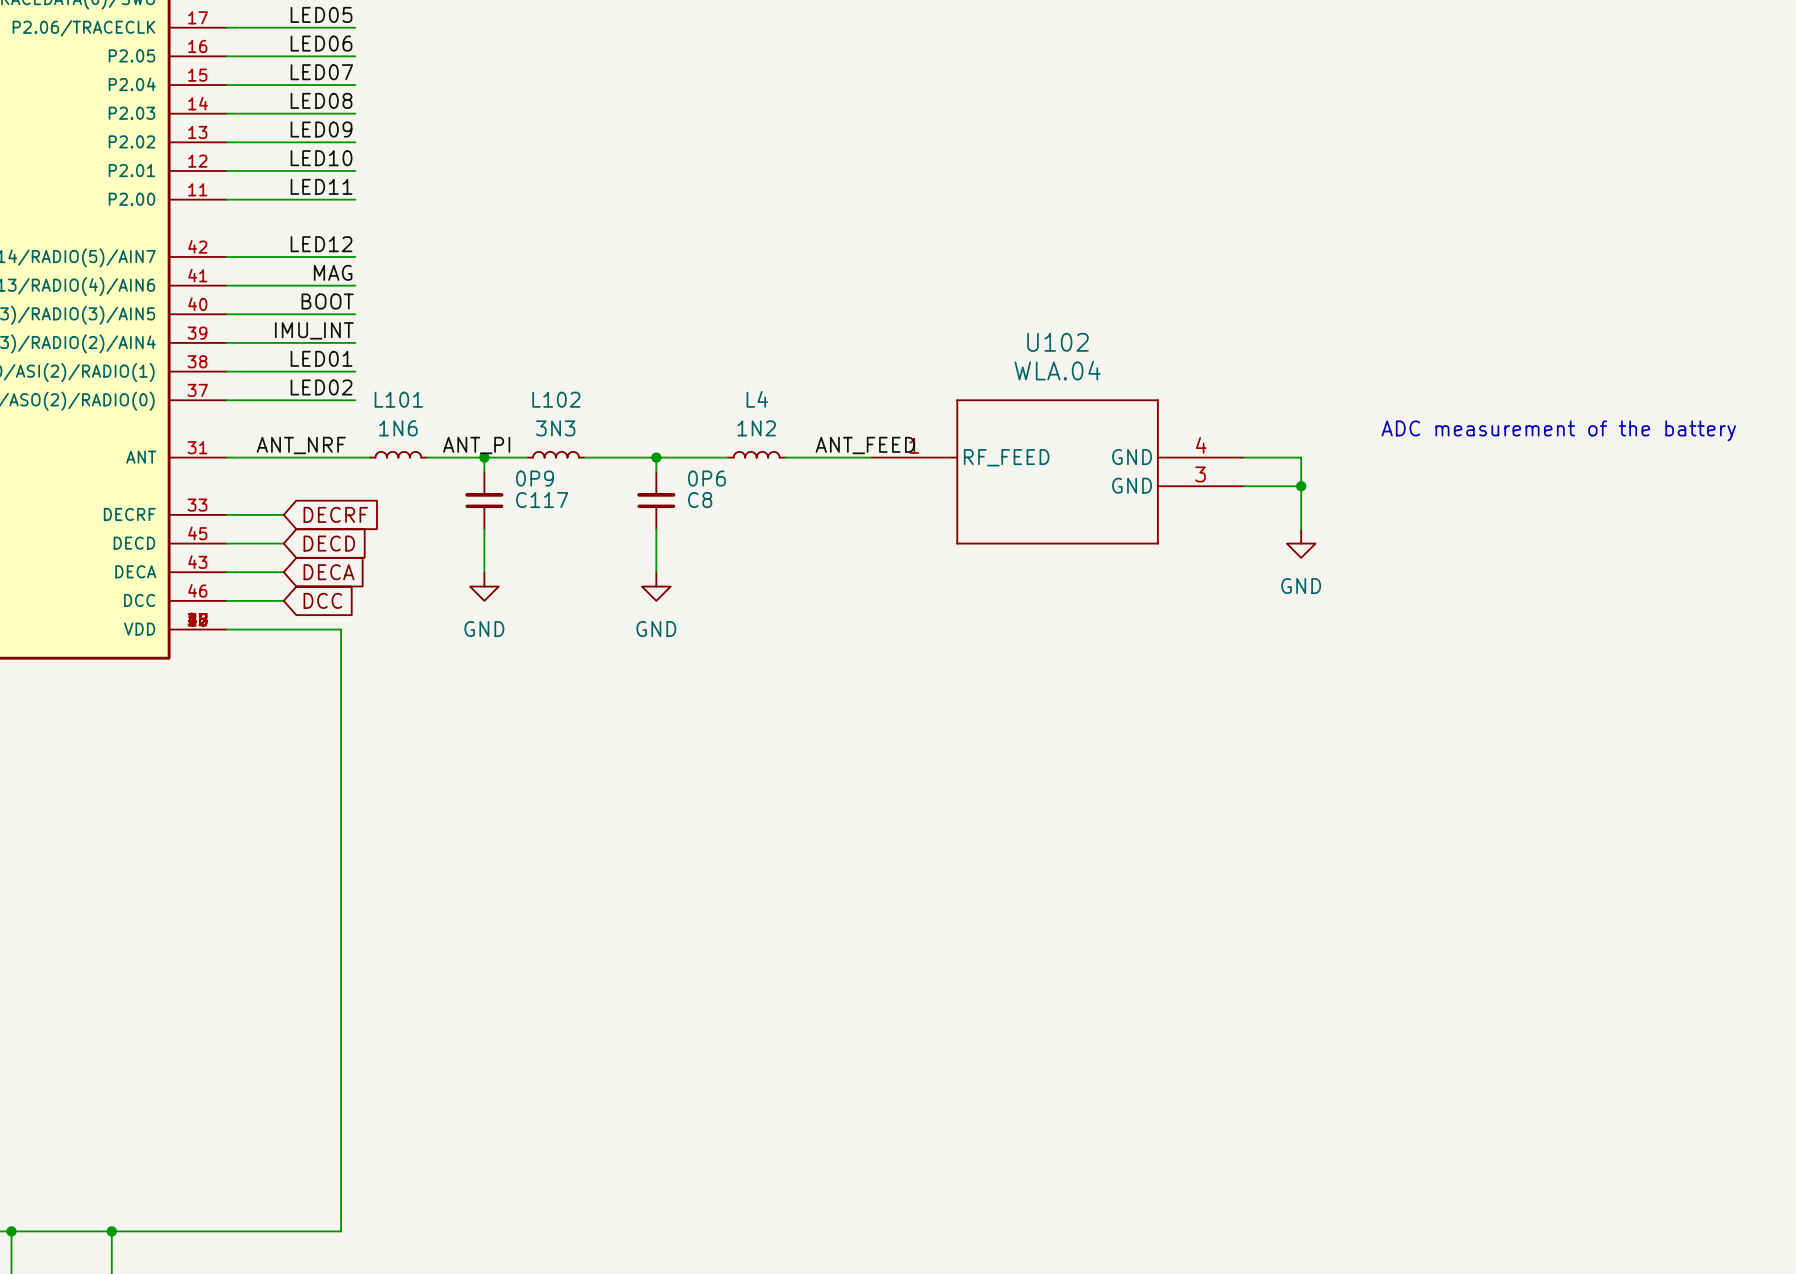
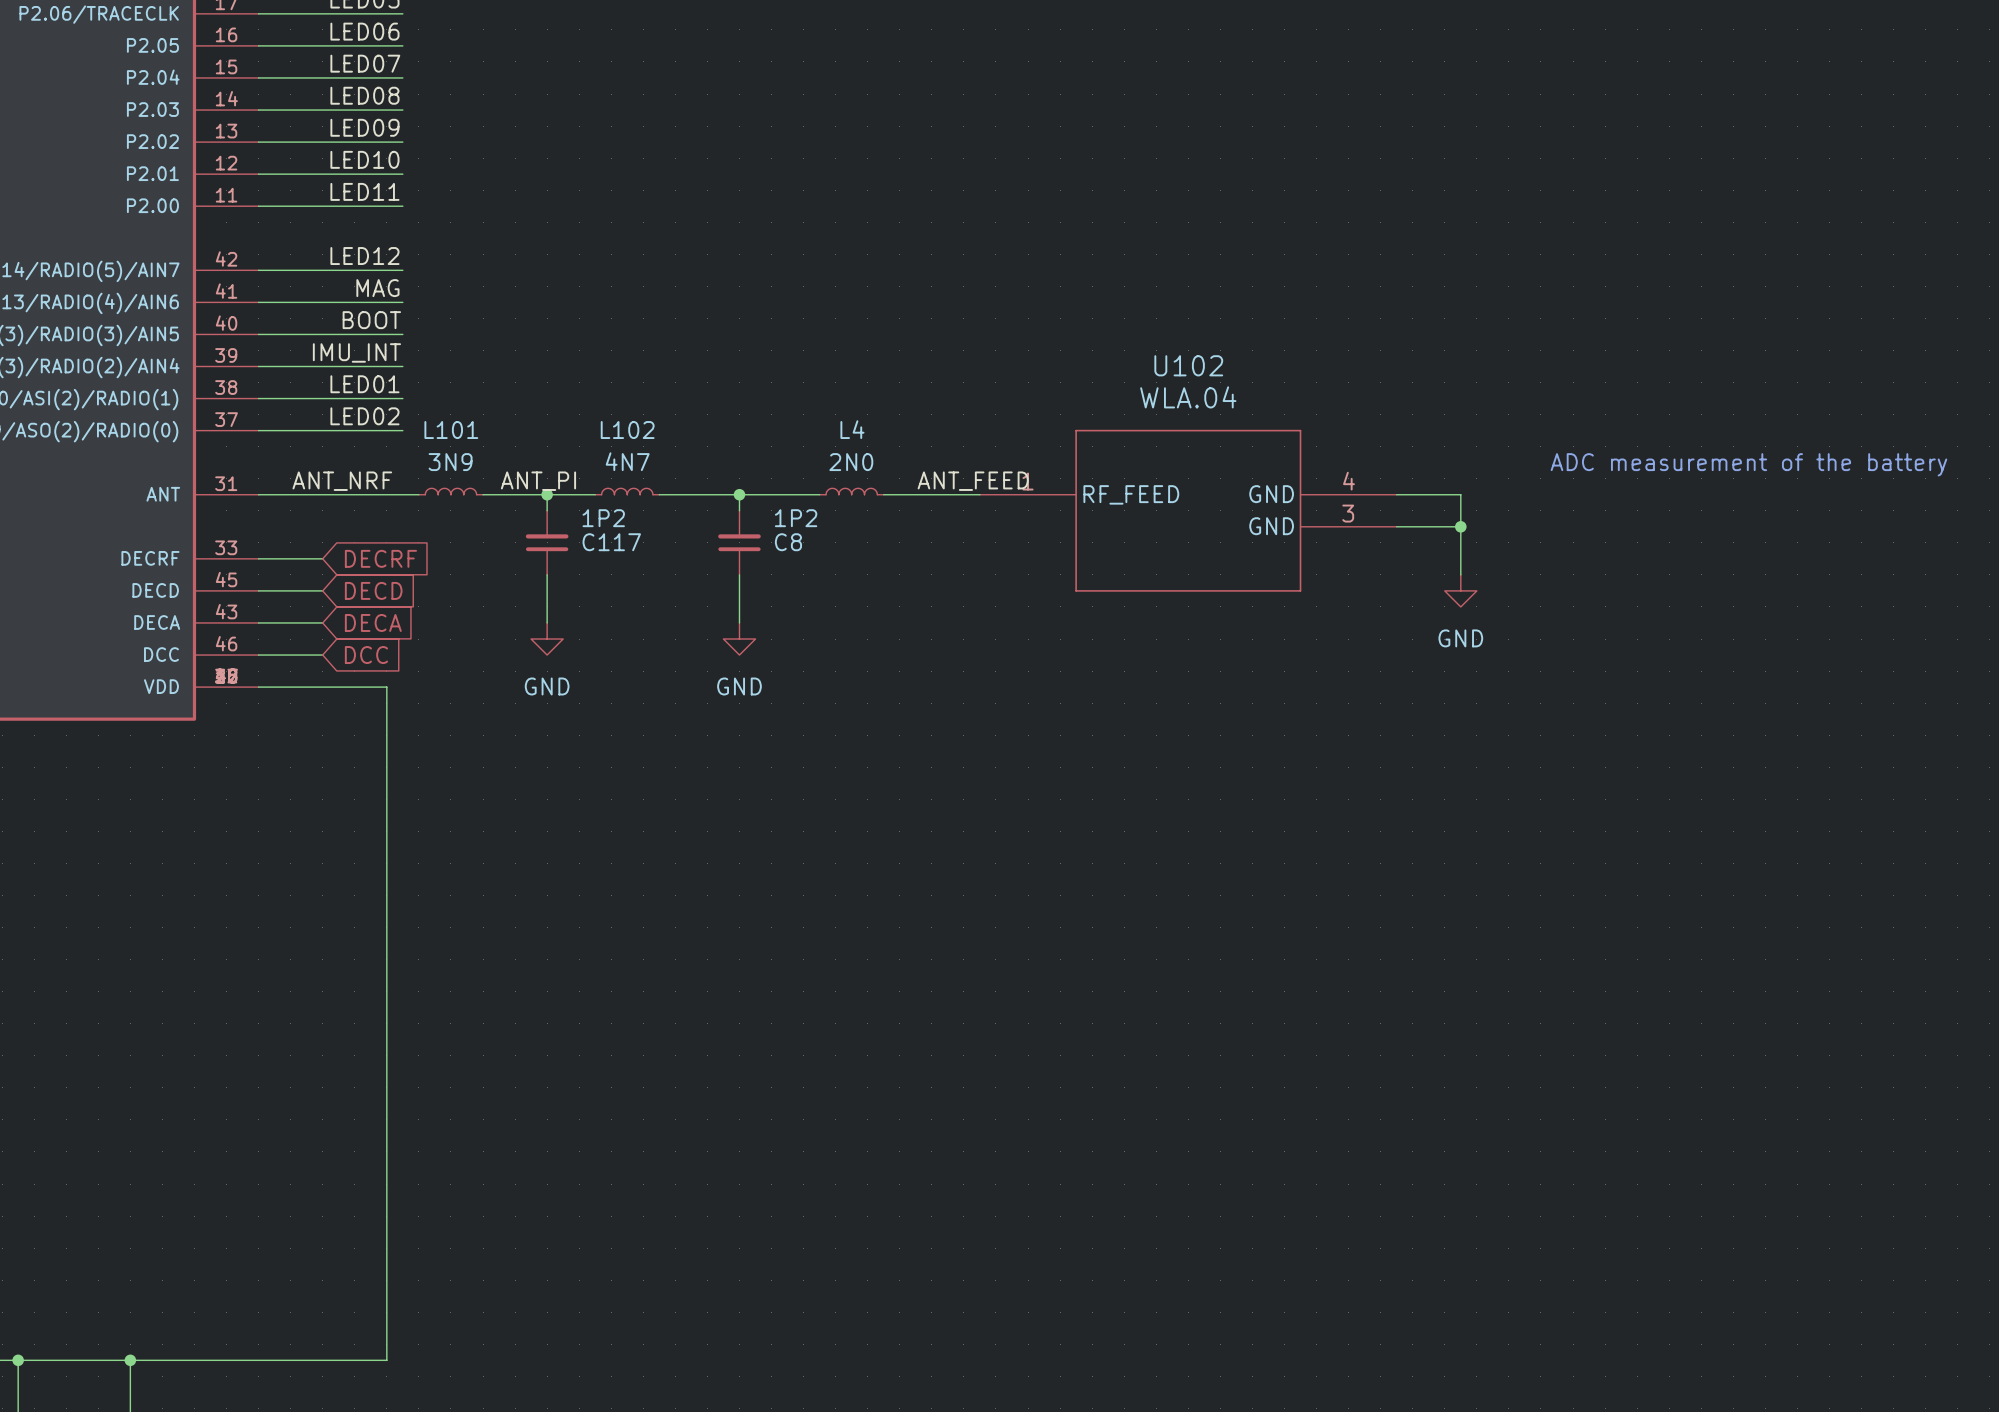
L101 value: 1N6 (398, 428) -> 3N9 (450, 462)
L102 value: 3N3 (555, 428) -> 4N7 (627, 461)
L4 value: 1N2 (756, 428) -> 2N0 (851, 462)
C117 value: 0P9 (534, 478) -> 1P2 (603, 518)
C8 value: 0P6 (706, 478) -> 1P2 (796, 518)

